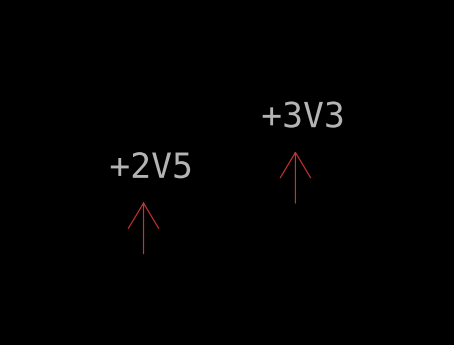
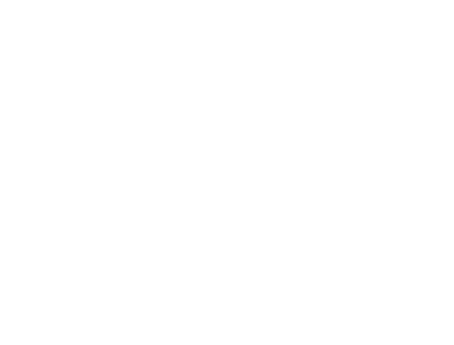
power symbol: +3V3 (295, 177) -> none
power symbol: +2V5 (143, 228) -> none

